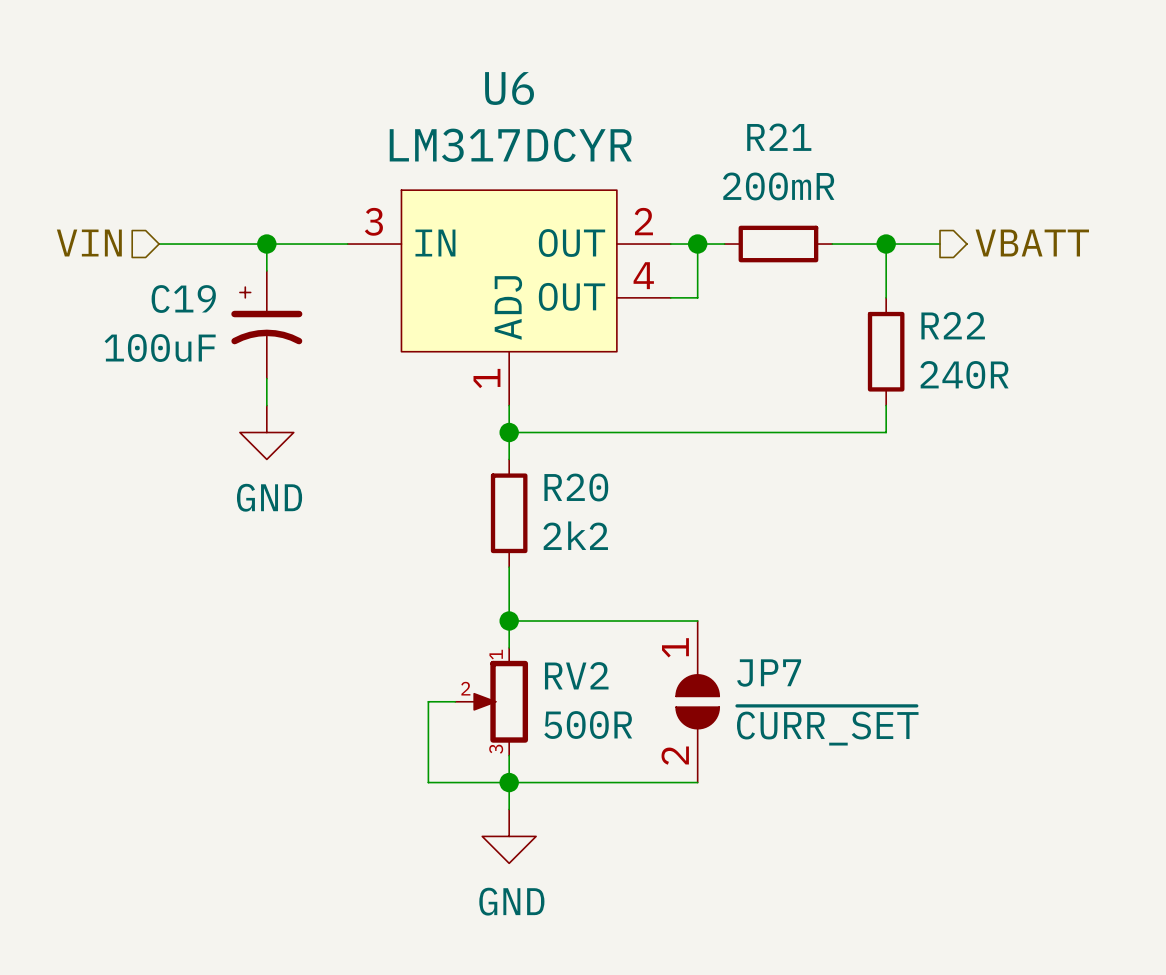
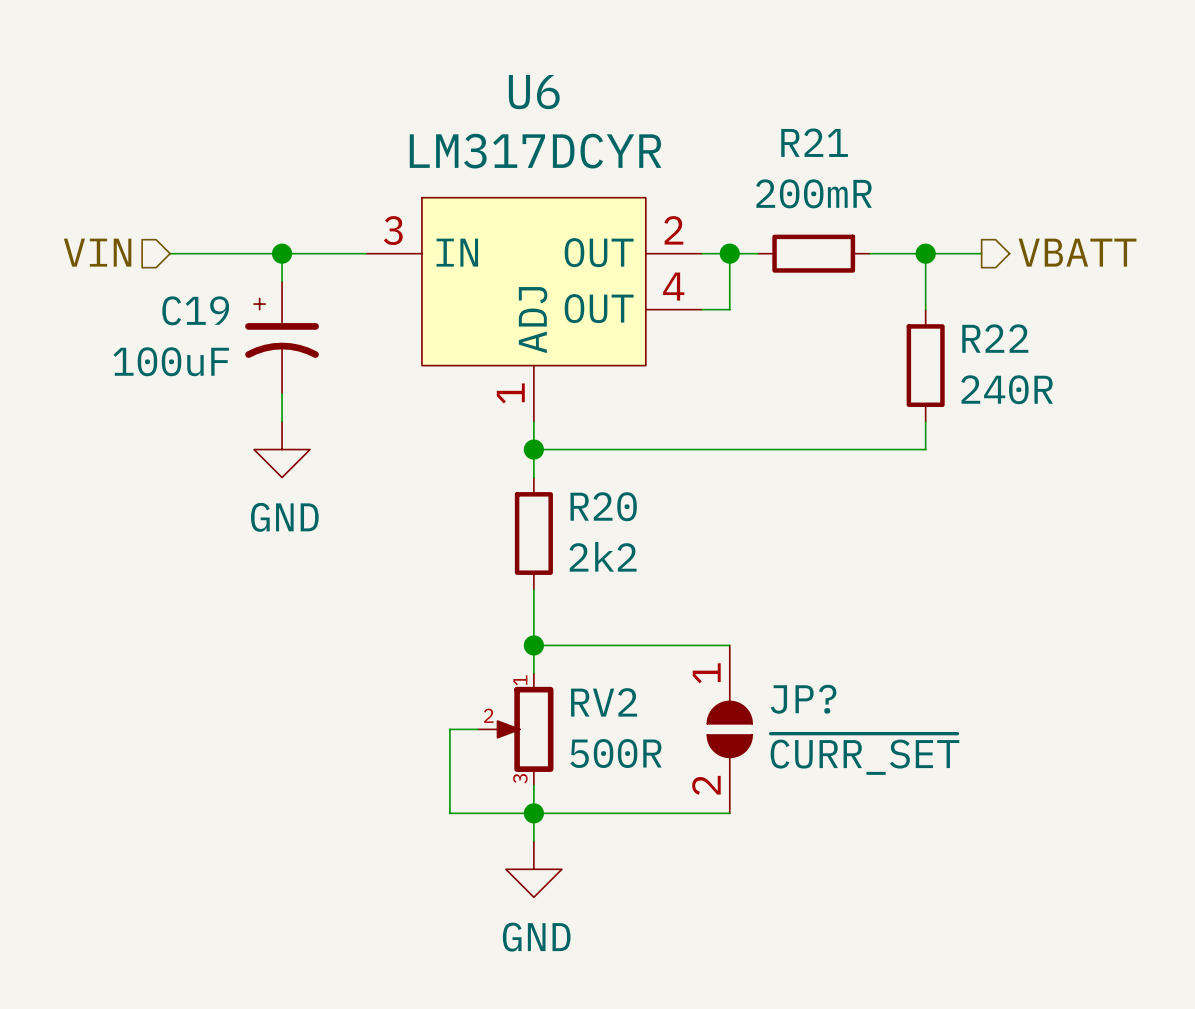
JP7 name: JP7 (769, 673) -> JP? (803, 699)

